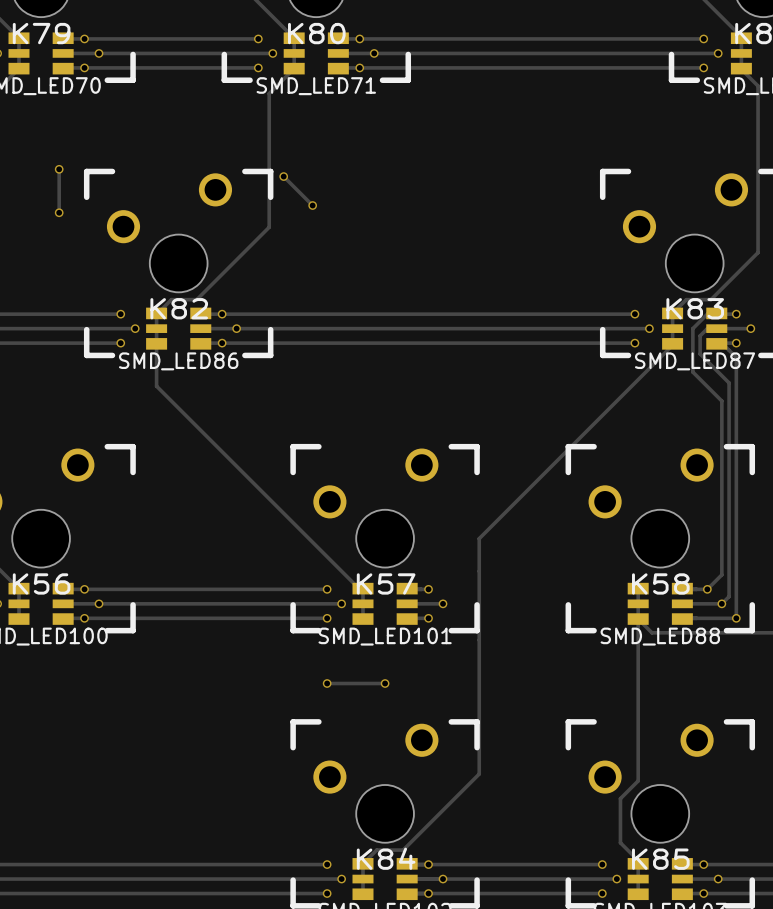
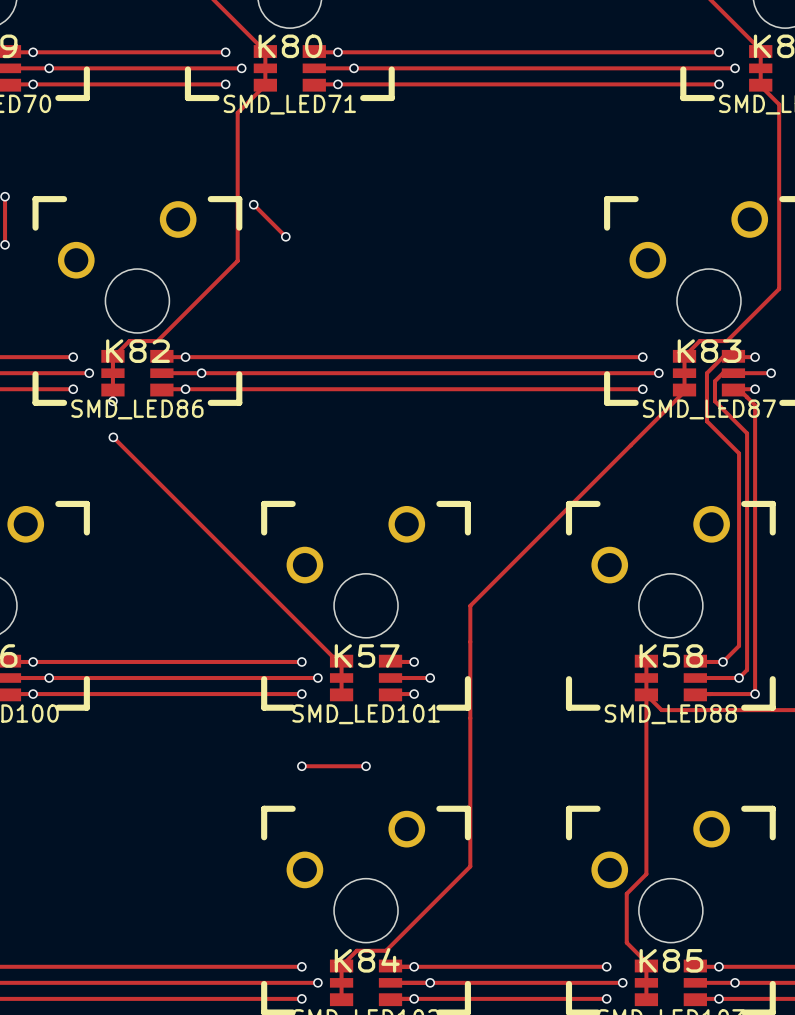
track: (156, 353) (156, 386) -> none
via: none -> (112, 401)
via: none -> (113, 437)

